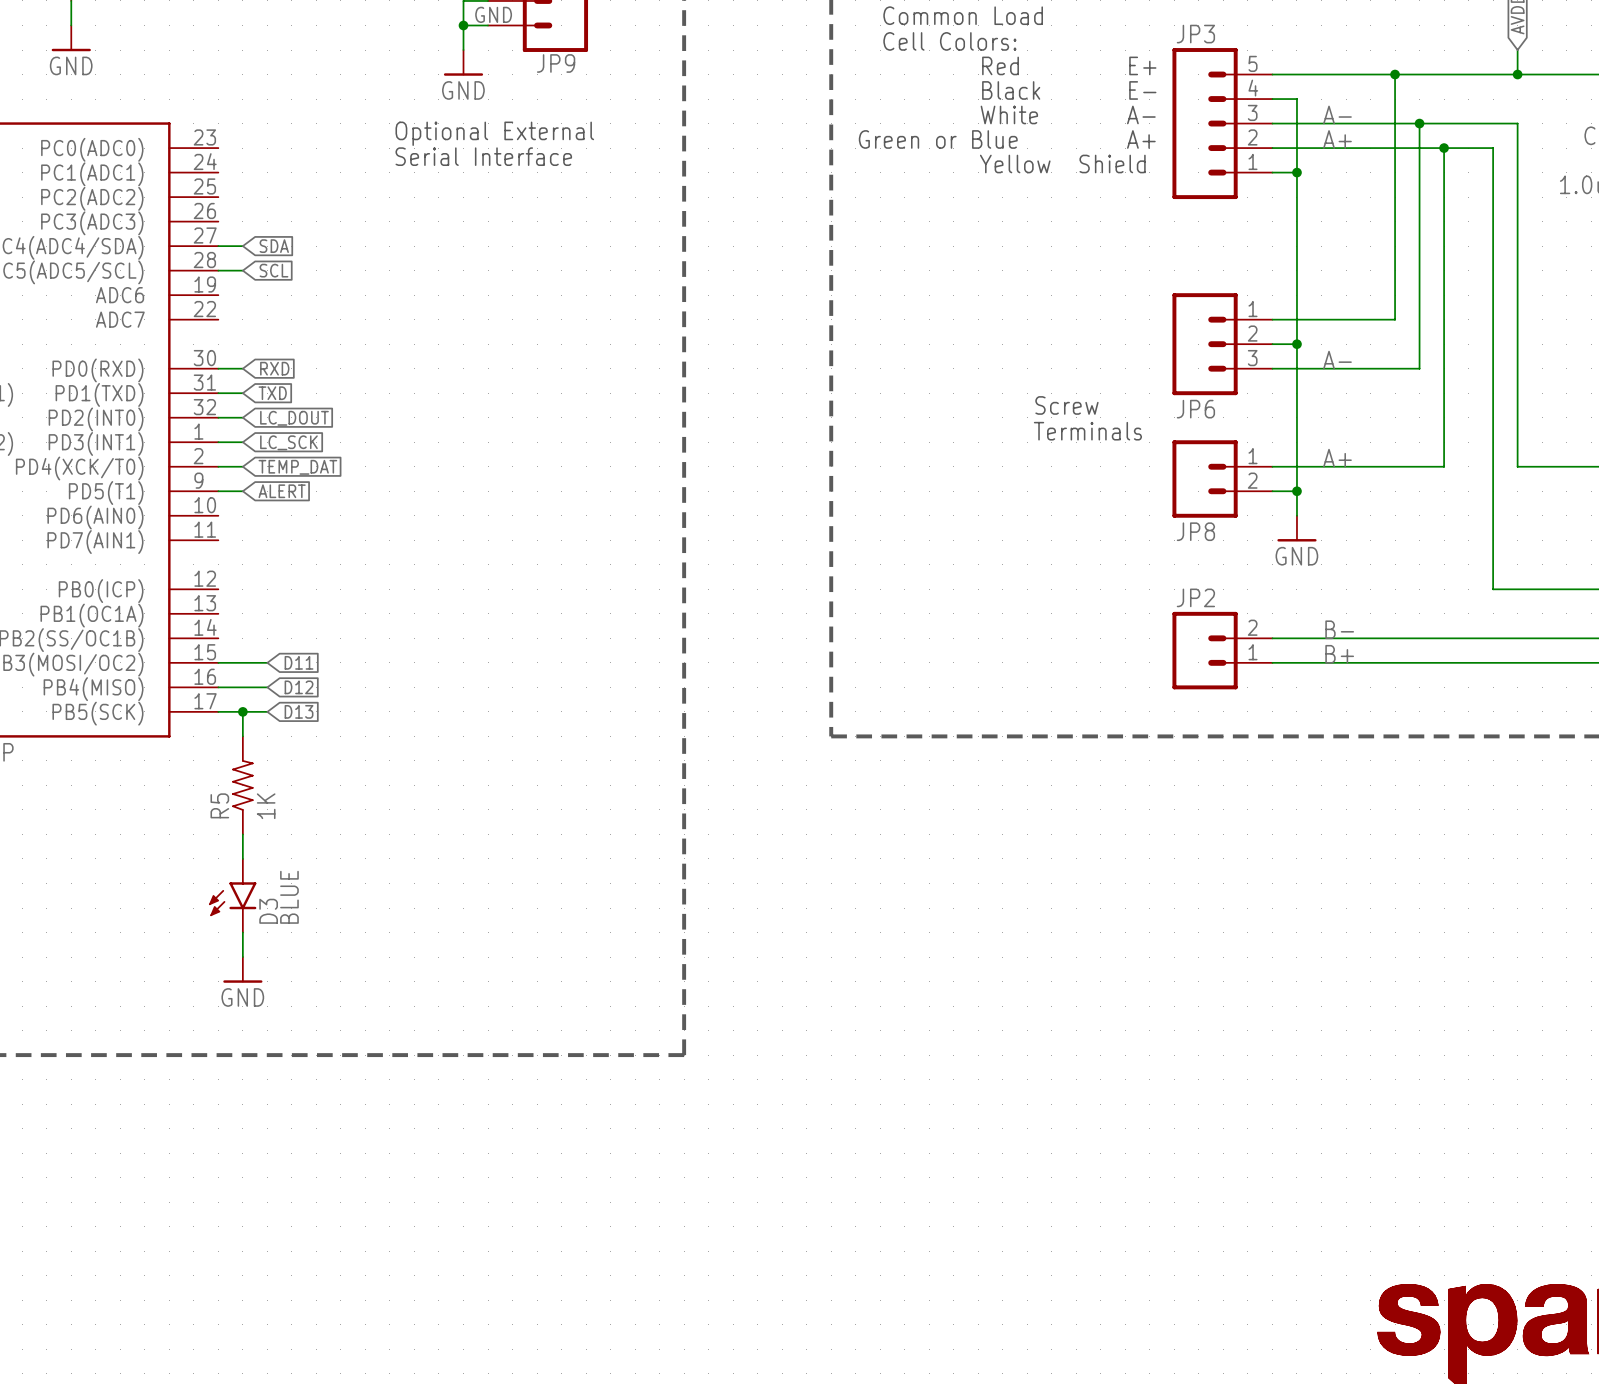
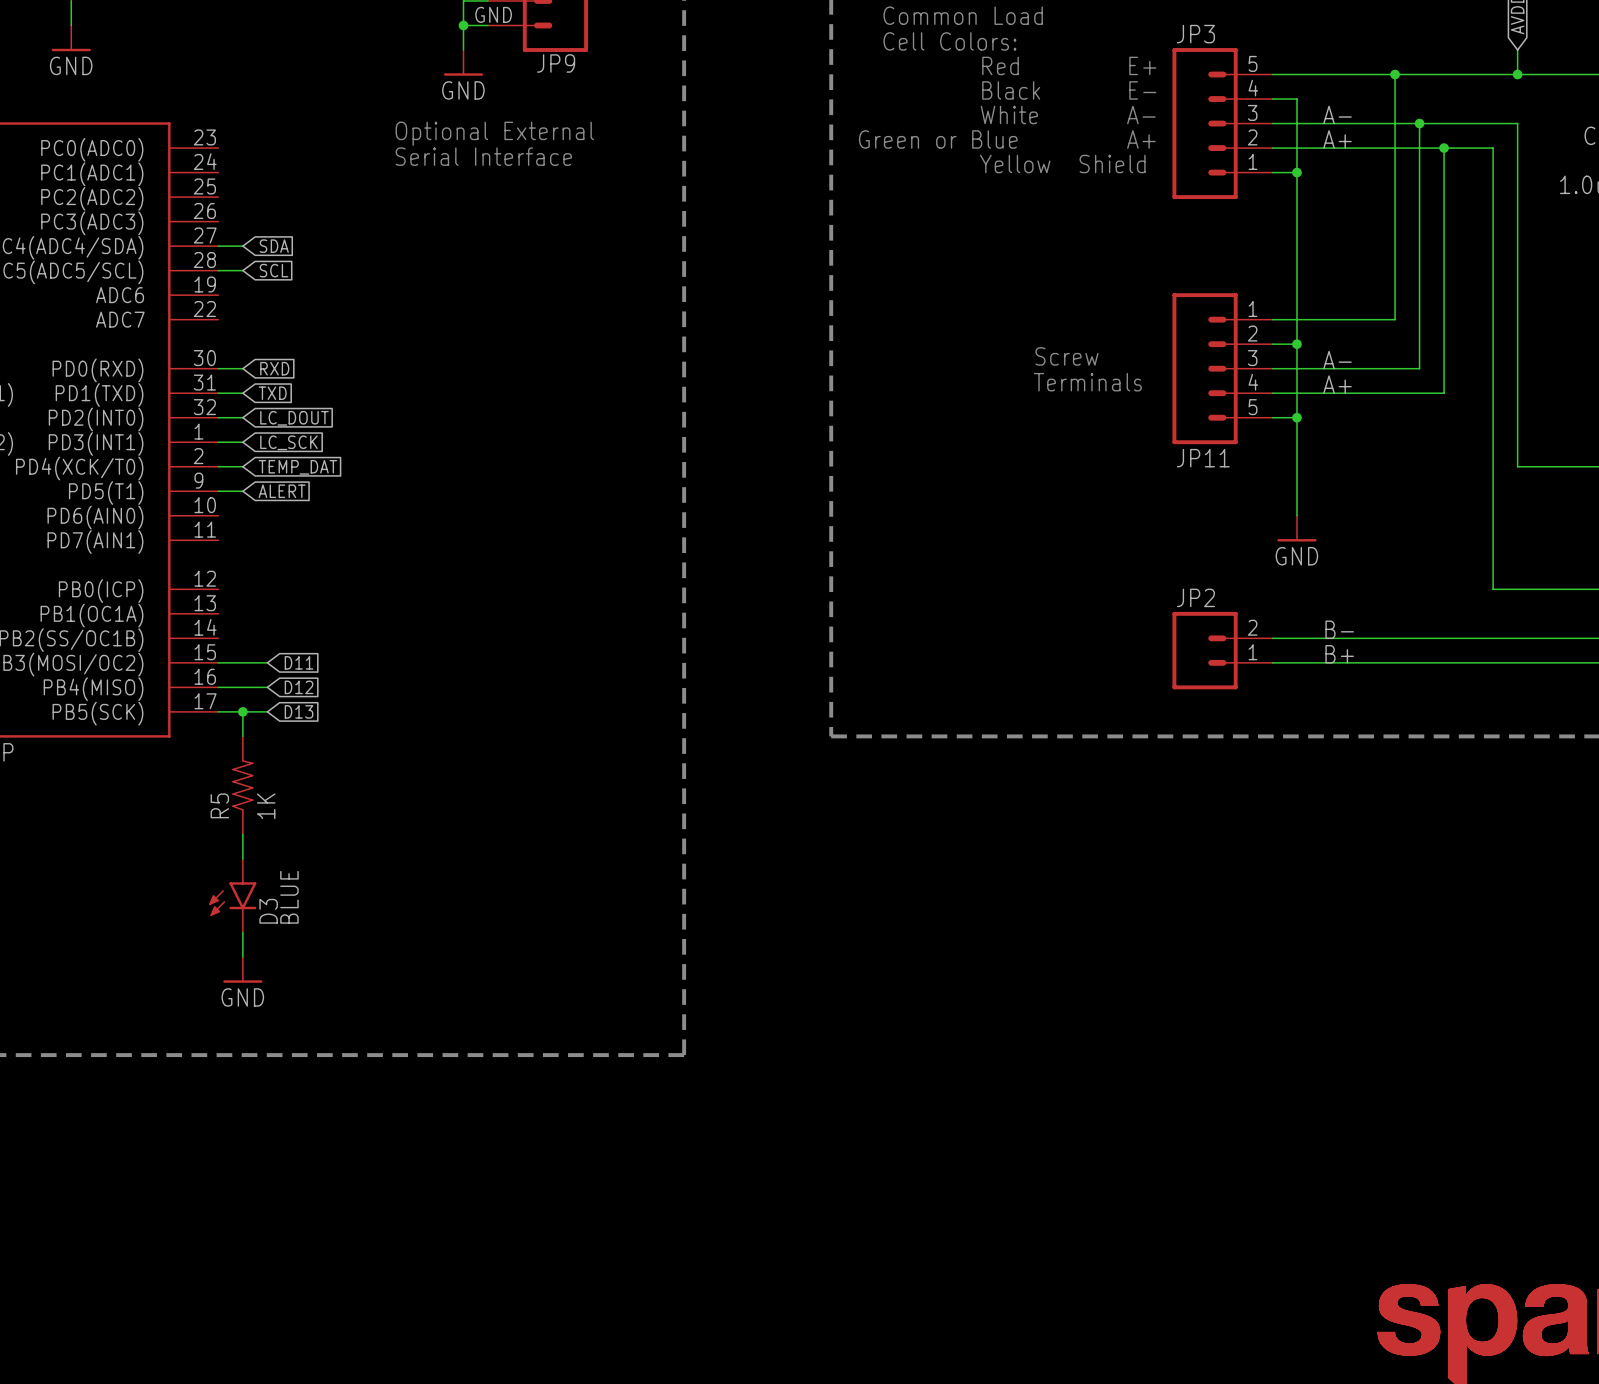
JP6: (1222, 344) -> none
JP11: none -> (1222, 368)
wire: (1444, 393) (1444, 466) (1272, 466) -> (1444, 393) (1272, 393)
text position: Screw (1066, 405) -> Screw (1066, 356)
junction: none -> (1296, 417)
text position: Terminals (1087, 431) -> Terminals (1087, 382)
label position: A+ (1337, 458) -> A+ (1337, 384)
JP8: (1222, 479) -> none
wire: (1272, 491) (1296, 491) -> (1272, 417) (1296, 417)
junction: (1296, 491) -> none

